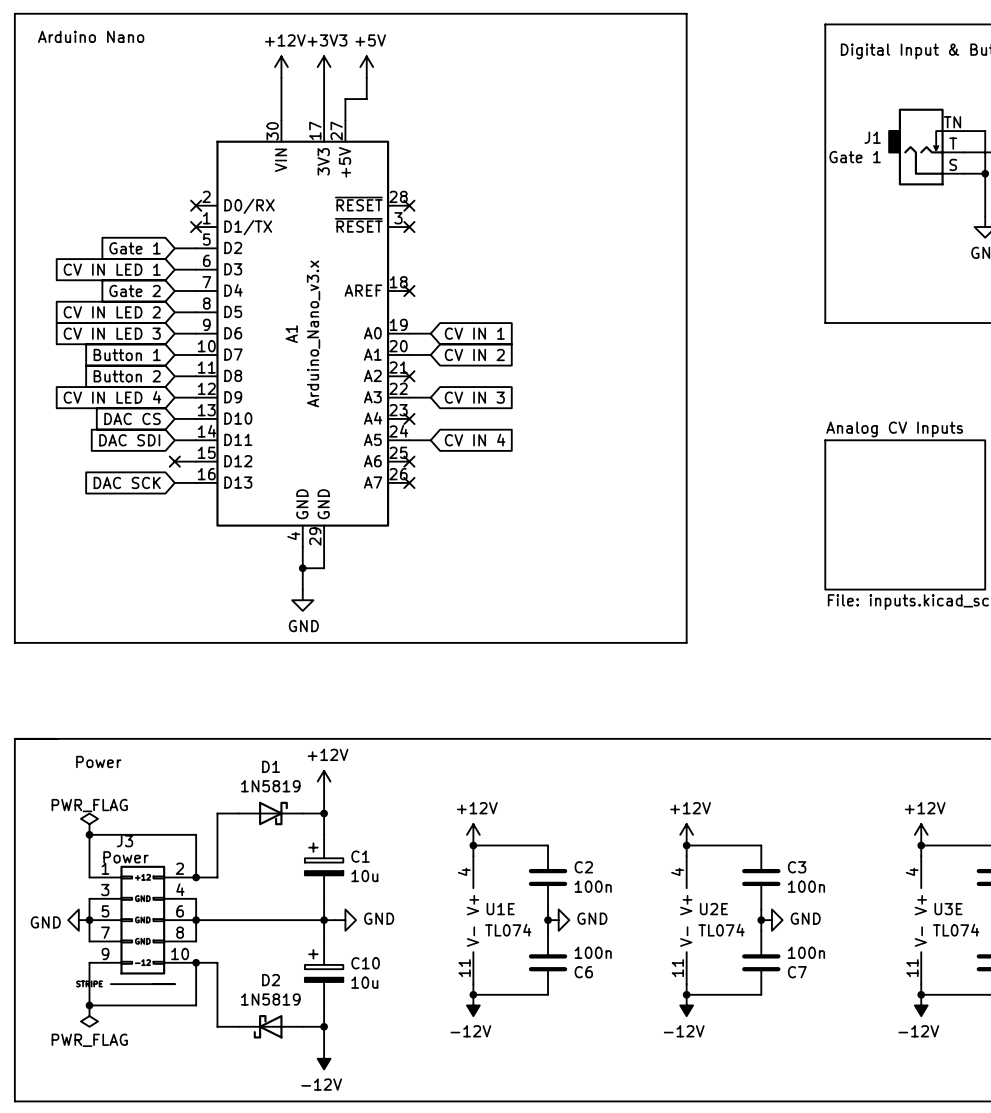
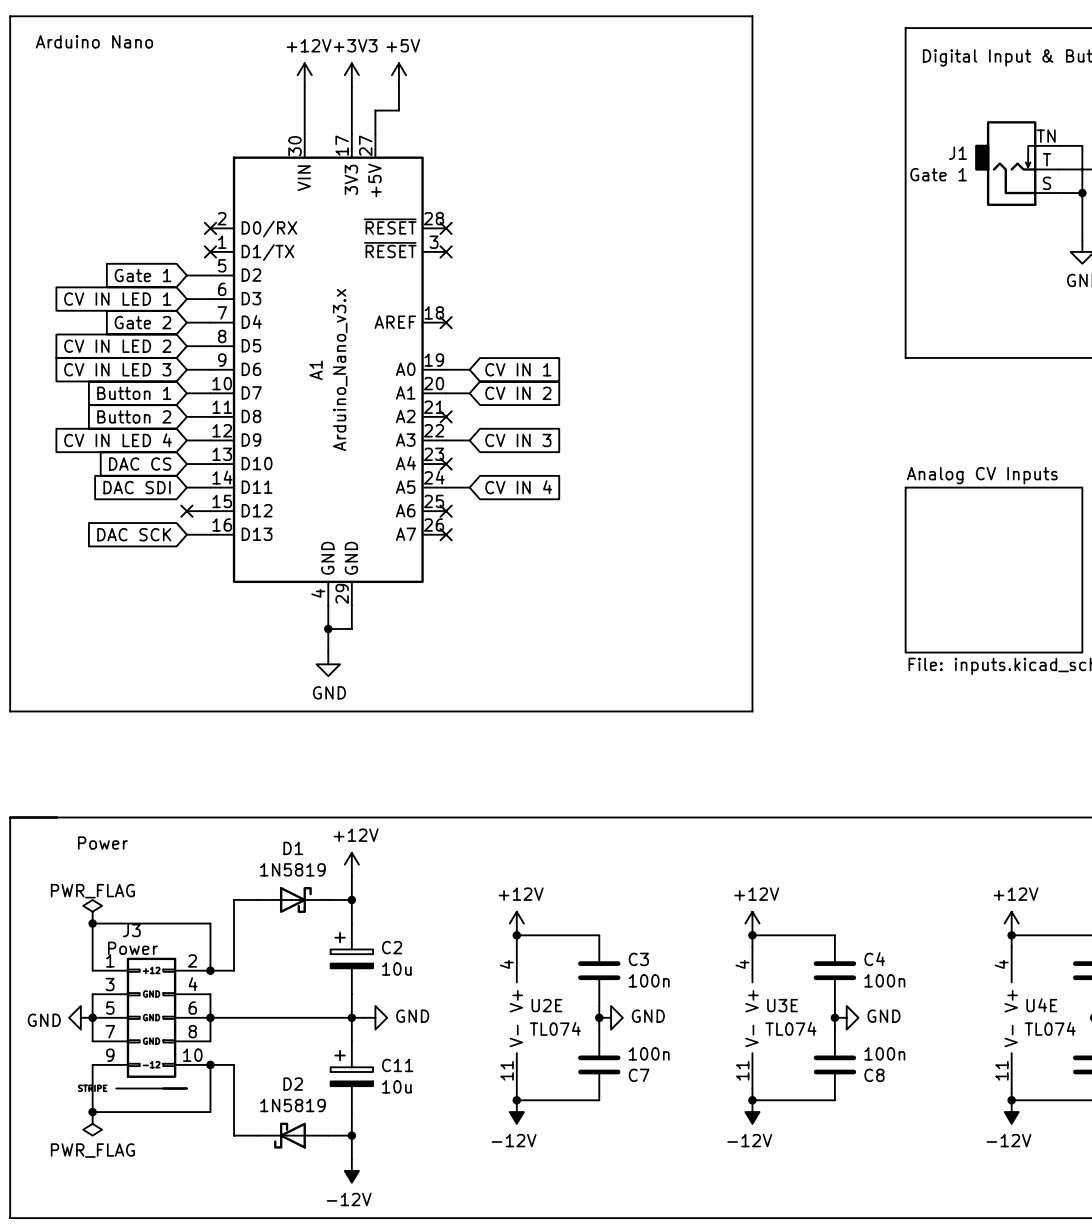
C1 name: C1 (360, 856) -> C2 (392, 947)
C2 name: C2 (583, 867) -> C3 (638, 959)
C3 name: C3 (797, 867) -> C4 (874, 959)
U1E name: U1E (500, 909) -> U2E (546, 1005)
U2E name: U2E (713, 909) -> U3E (782, 1005)
U3E name: U3E (948, 909) -> U4E (1041, 1005)
C10 name: C10 (365, 963) -> C11 (397, 1065)
C6 name: C6 (583, 972) -> C7 (639, 1075)
C7 name: C7 (797, 972) -> C8 (874, 1075)

